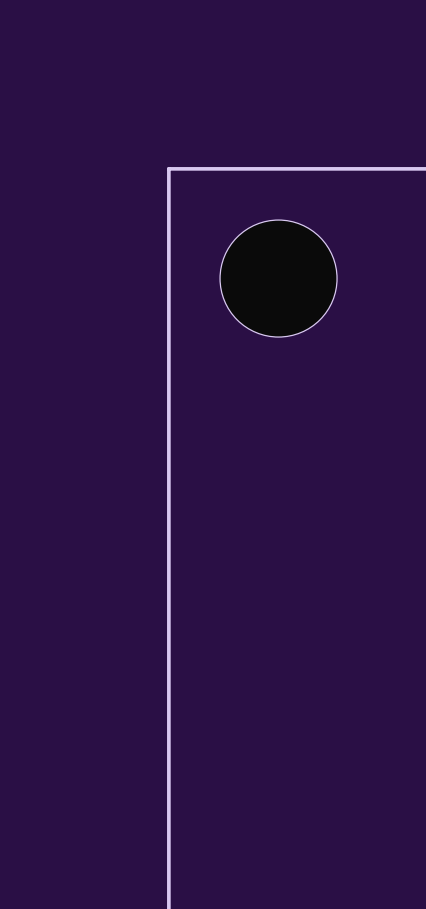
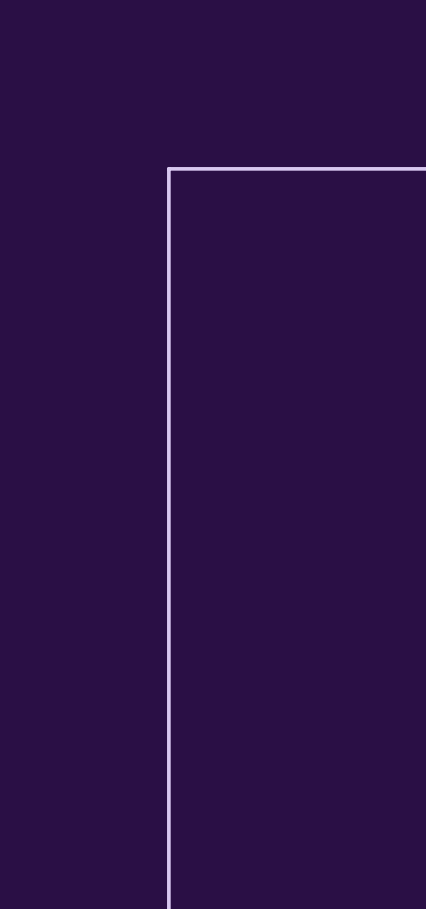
part: (278, 278) -> none

